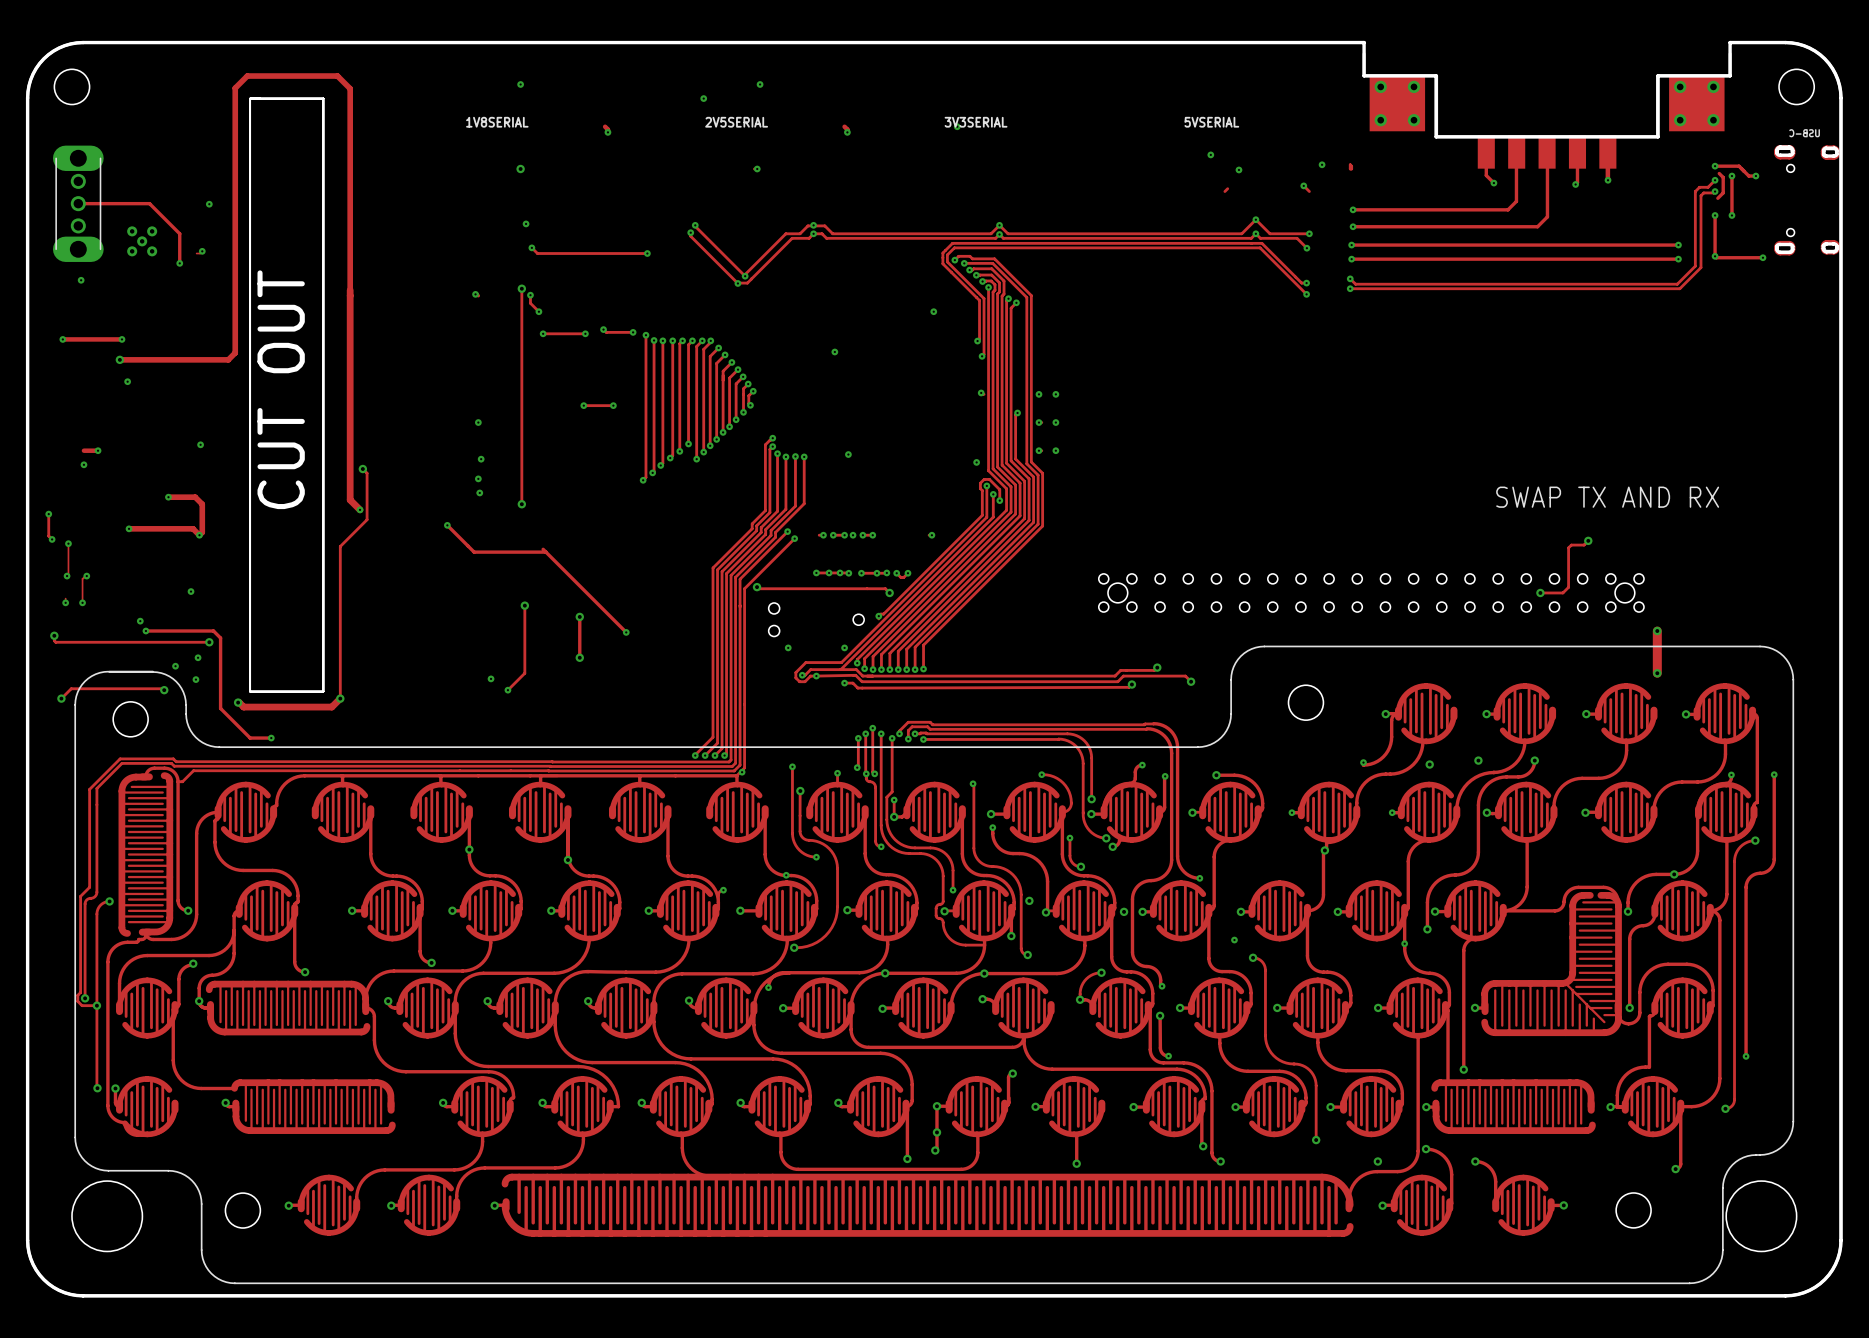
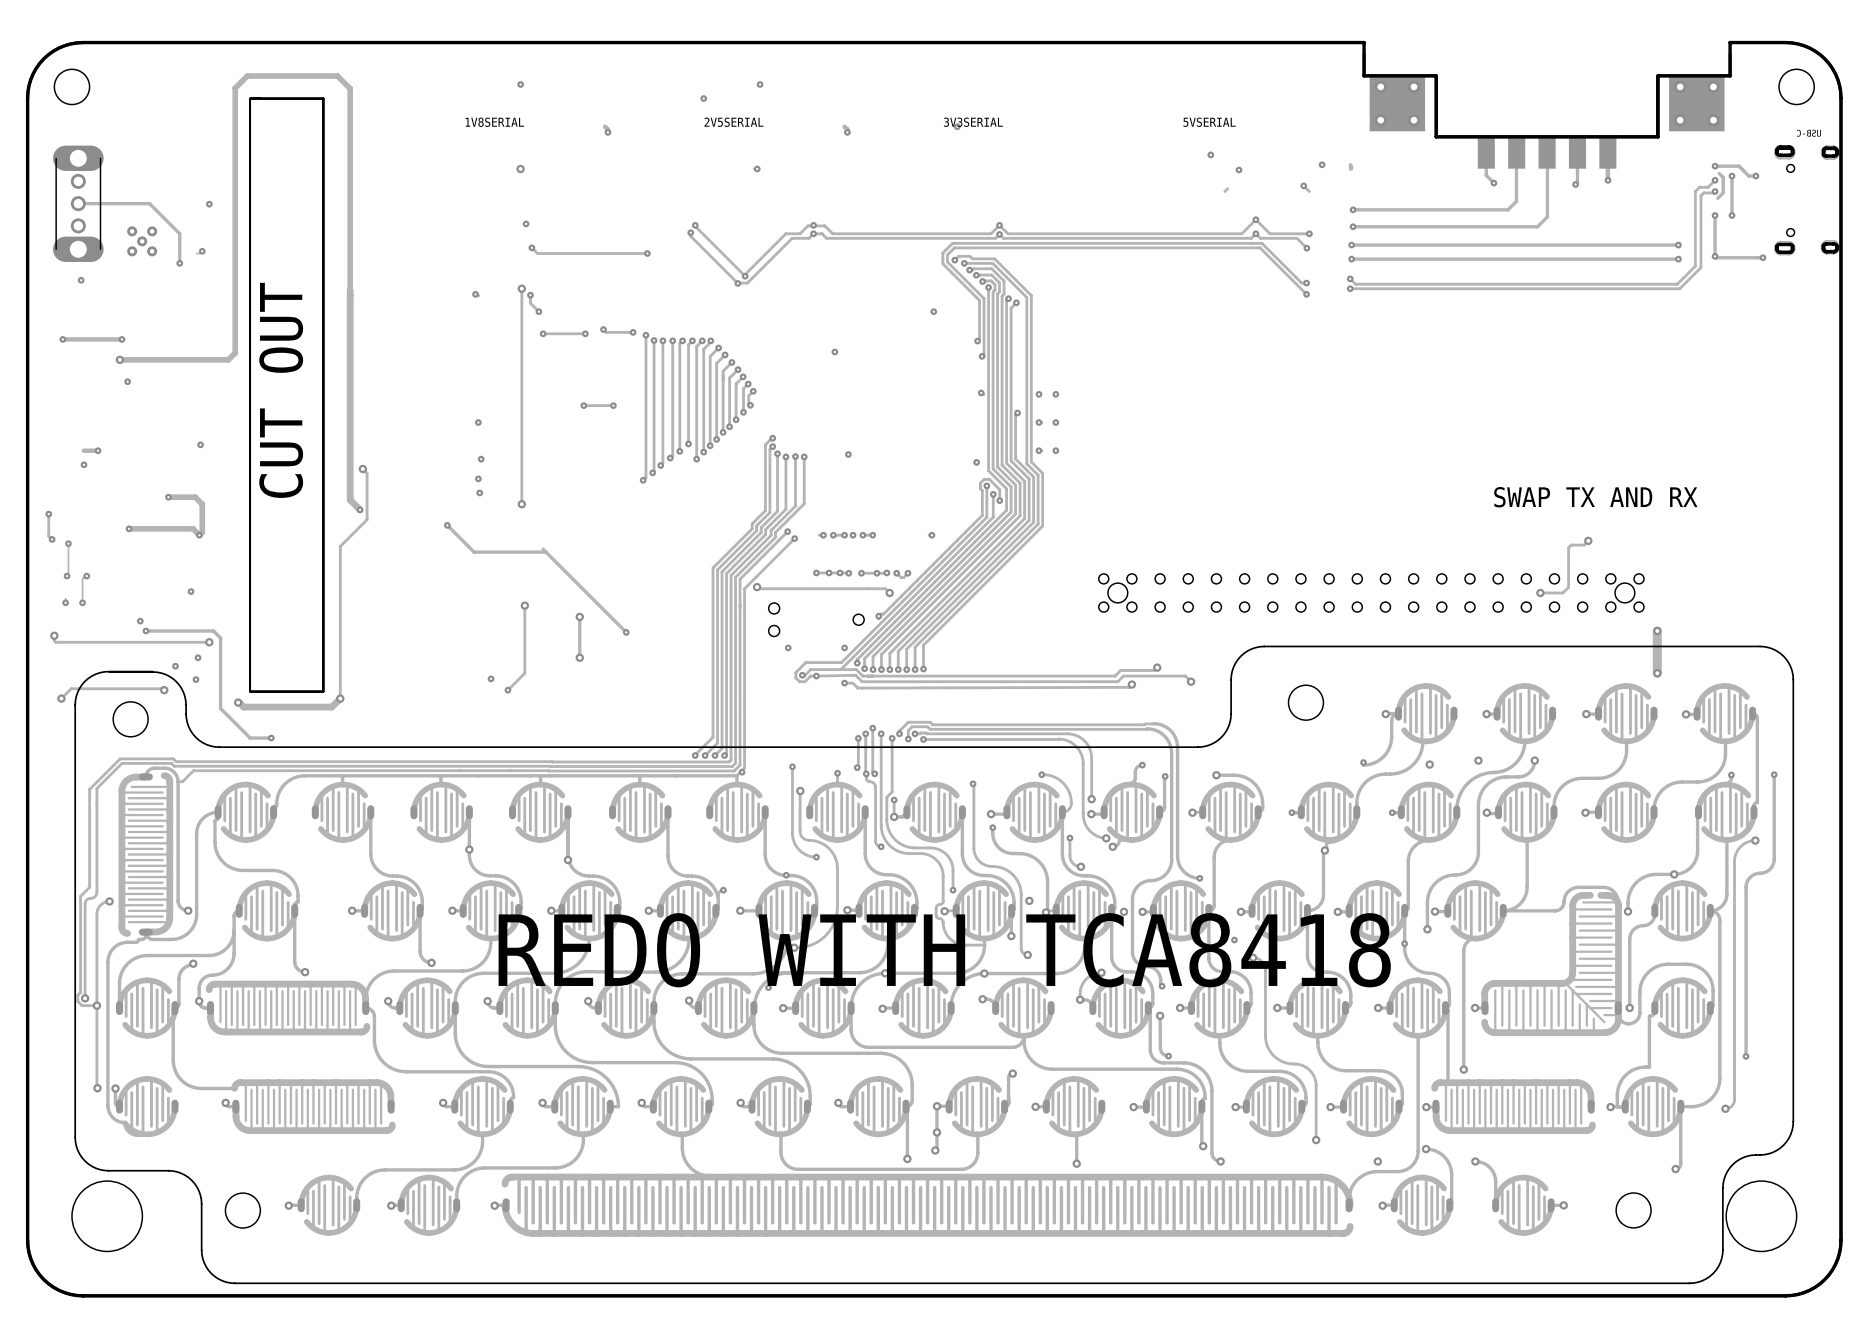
text: none -> REDO WITH TCA8418 (944, 950)

